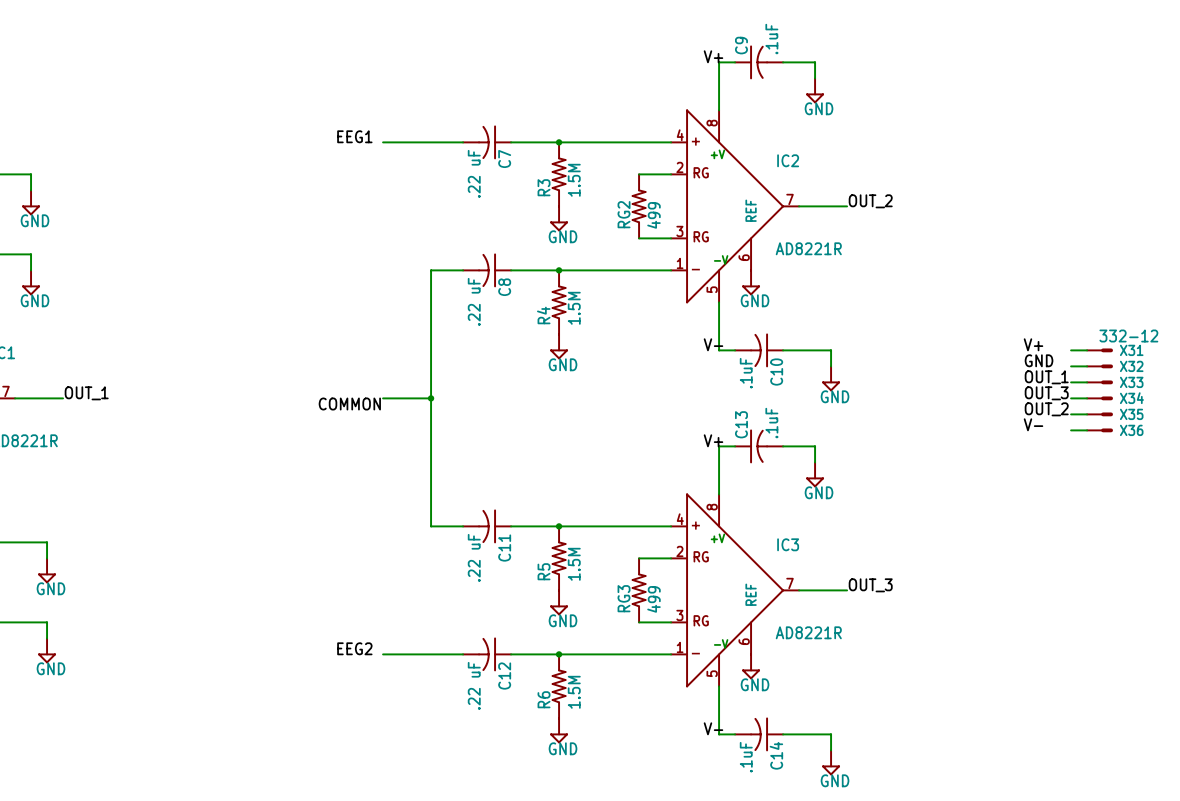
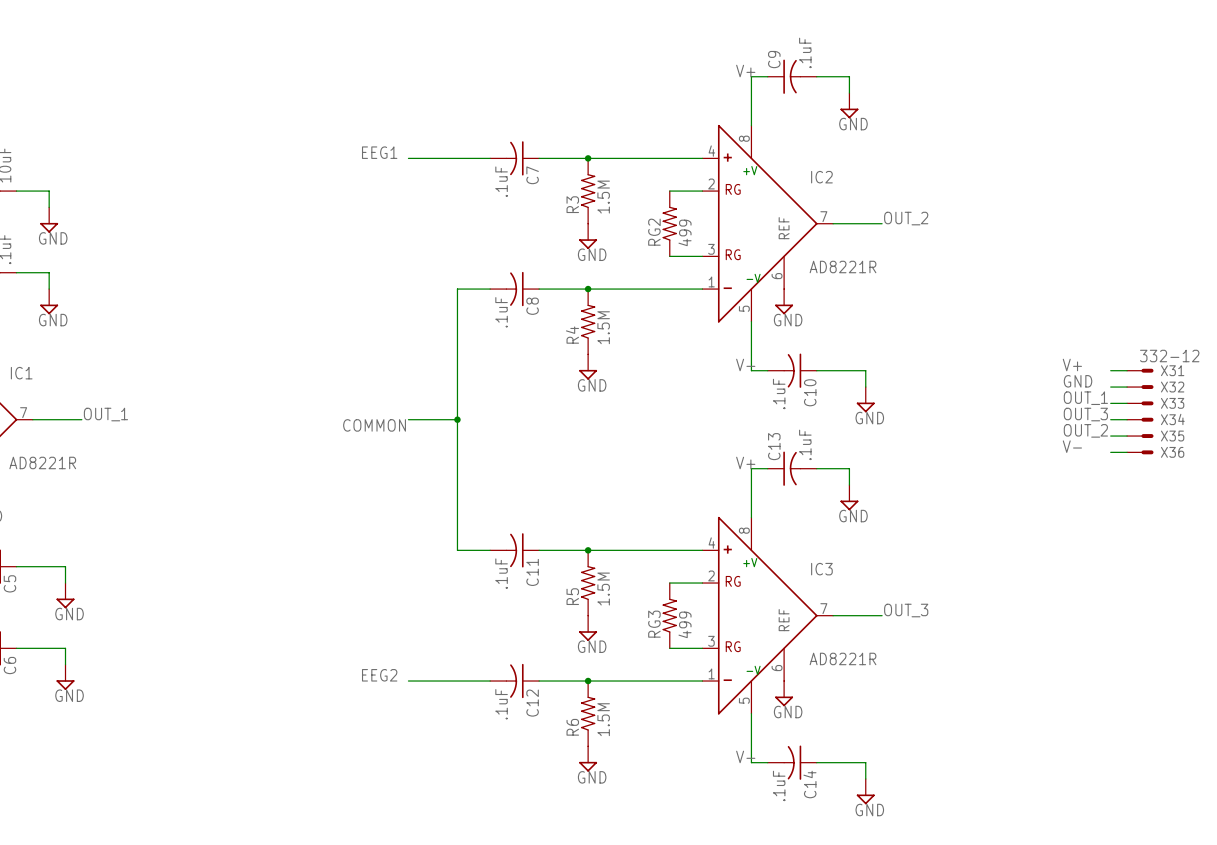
C7 value: .22 uF (474, 173) -> .1uF (501, 181)
C8 value: .22 uF (474, 301) -> .1uF (501, 312)
C11 value: .22 uF (474, 557) -> .1uF (501, 573)
C12 value: .22 uF (474, 685) -> .1uF (501, 704)

